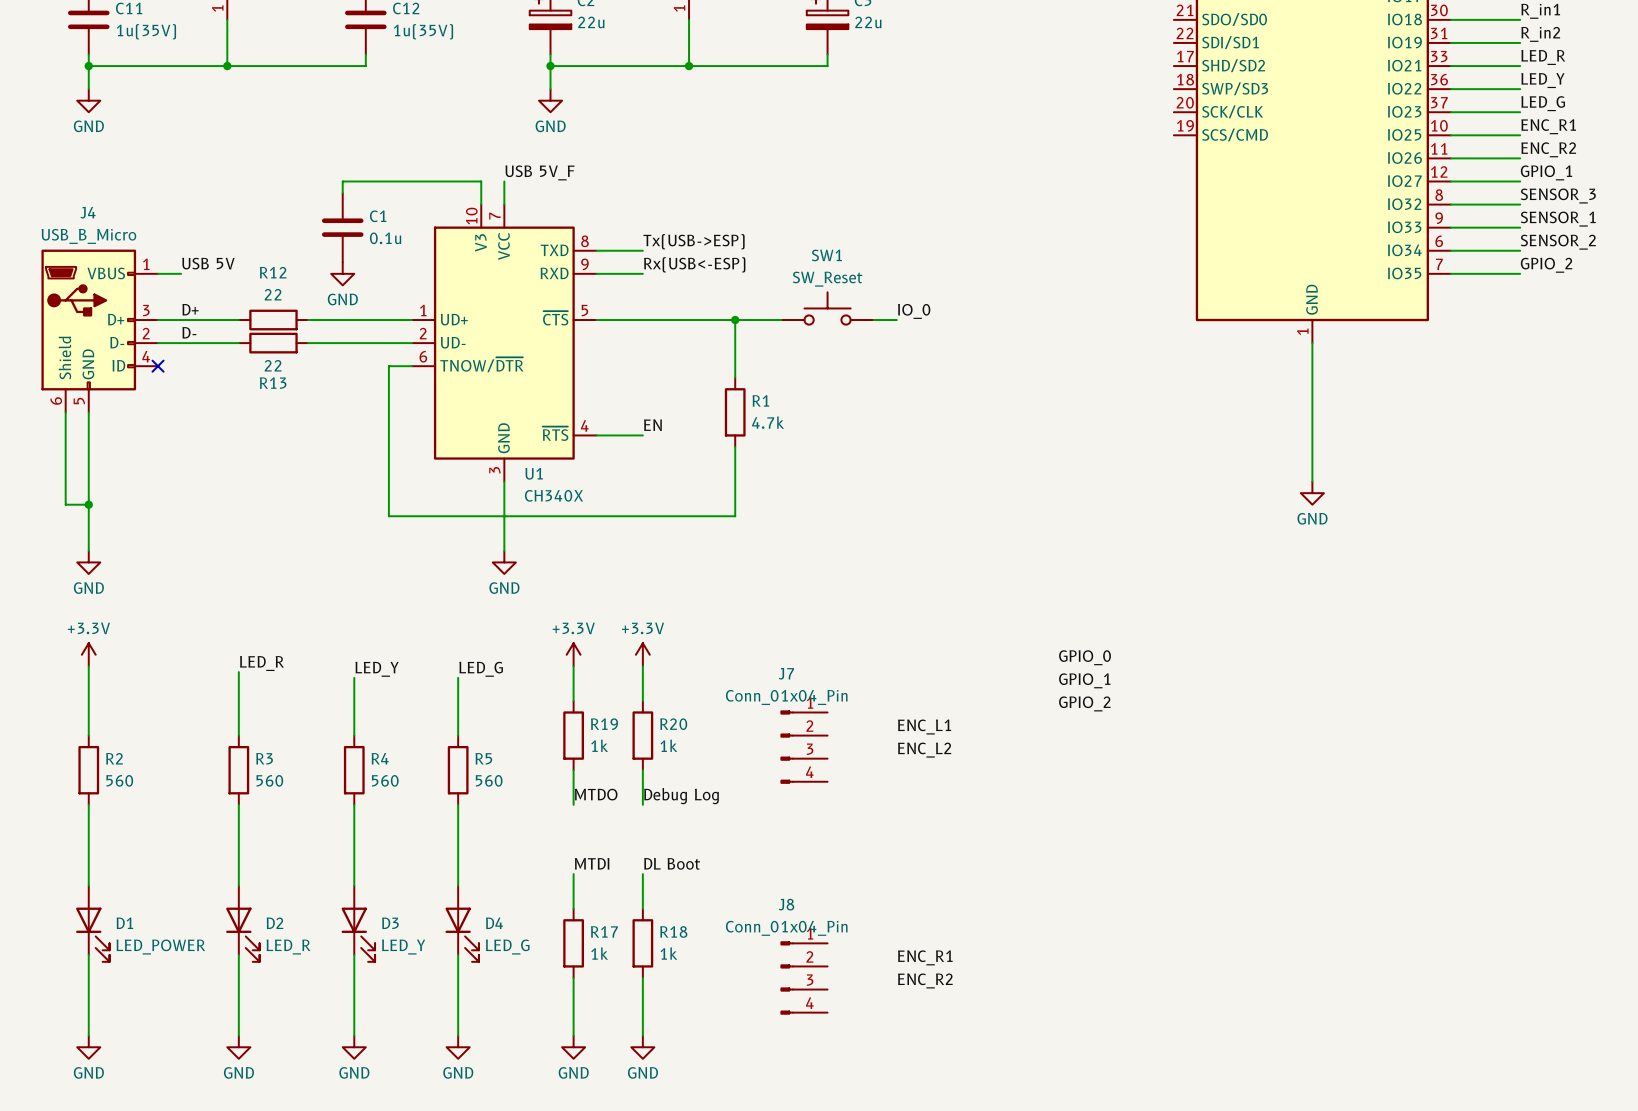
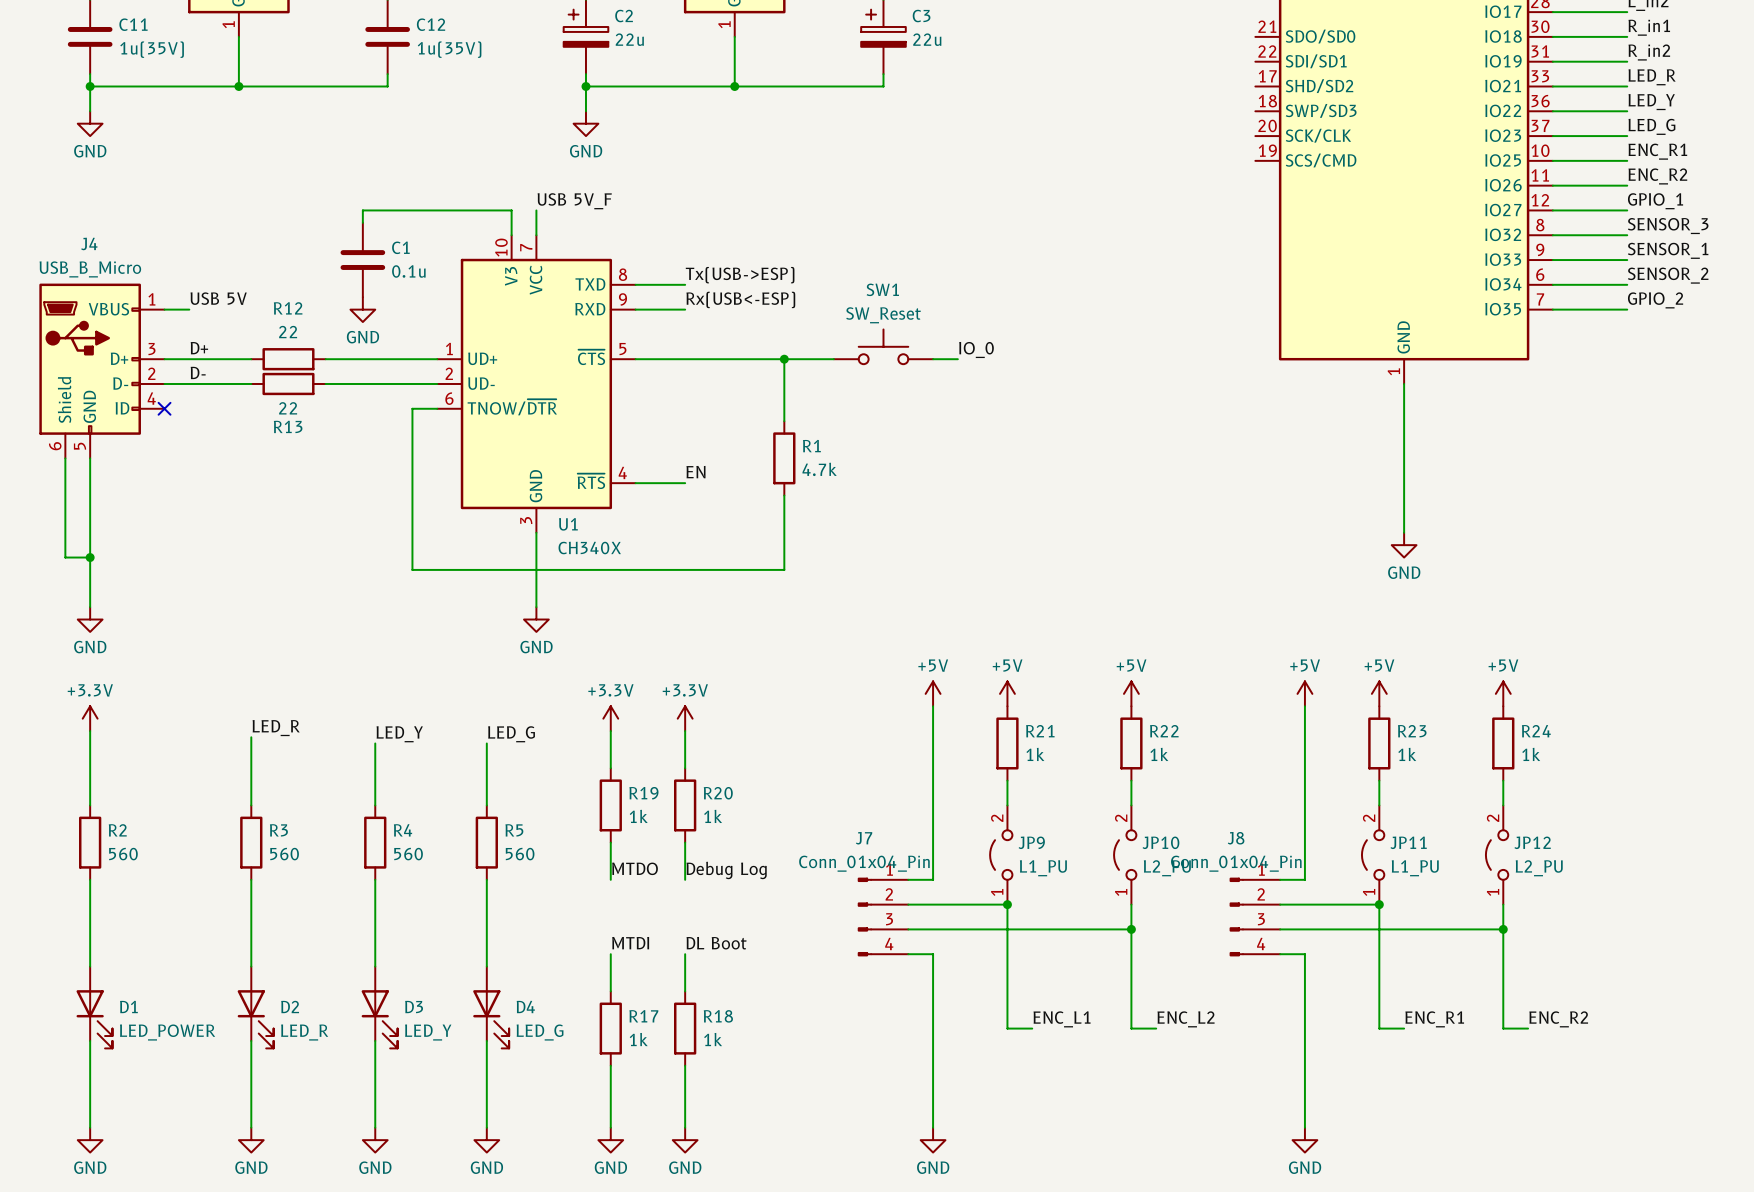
power symbol: none -> +5V (933, 693)
power symbol: none -> +5V (1007, 693)
power symbol: none -> +5V (1131, 693)
power symbol: none -> +5V (1304, 693)
power symbol: none -> +5V (1379, 693)
power symbol: none -> +5V (1503, 693)
wire: none -> (933, 706) (933, 879) (908, 879)
wire: none -> (1304, 706) (1304, 879) (1280, 879)
label: GPIO_0 (1085, 657) -> none
R21: none -> 1k (1007, 743)
R22: none -> 1k (1131, 743)
R23: none -> 1k (1379, 743)
R24: none -> 1k (1503, 743)
label: GPIO_1 (1084, 680) -> none
label: GPIO_2 (1084, 703) -> none
wire: none -> (1007, 780) (1007, 805)
wire: none -> (1131, 780) (1131, 805)
wire: none -> (1379, 780) (1379, 805)
wire: none -> (1503, 780) (1503, 805)
label position: ENC_L1 (924, 727) -> ENC_L1 (1062, 1019)
J7 position: (804, 747) -> (883, 917)
label: ENC_L2 (924, 750) -> none
JP9: none -> L1_PU (1001, 855)
JP10: none -> L2_PU (1125, 855)
JP11: none -> L1_PU (1373, 855)
JP12: none -> L2_PU (1497, 855)
wire: none -> (908, 904) (1007, 904) (1007, 1028) (1032, 1028)
junction: none -> (1007, 904)
wire: none -> (1131, 904) (1131, 1028) (1156, 1028)
wire: none -> (1280, 904) (1379, 904) (1379, 1028) (1404, 1028)
junction: none -> (1379, 904)
wire: none -> (1503, 904) (1503, 1028) (1528, 1028)
wire: none -> (908, 929) (1131, 929)
junction: none -> (1131, 929)
wire: none -> (1280, 929) (1503, 929)
junction: none -> (1503, 929)
wire: none -> (908, 954) (933, 954) (933, 1127)
wire: none -> (1280, 954) (1304, 954) (1304, 1127)
label: none -> ENC_L2 (1186, 1019)
label: none -> ENC_R1 (1434, 1019)
label: none -> ENC_R2 (1558, 1019)
label: ENC_R1 (925, 957) -> none
J8 position: (804, 977) -> (1254, 917)
label: ENC_R2 (925, 980) -> none
power symbol: none -> GND (933, 1140)
power symbol: none -> GND (1304, 1140)

